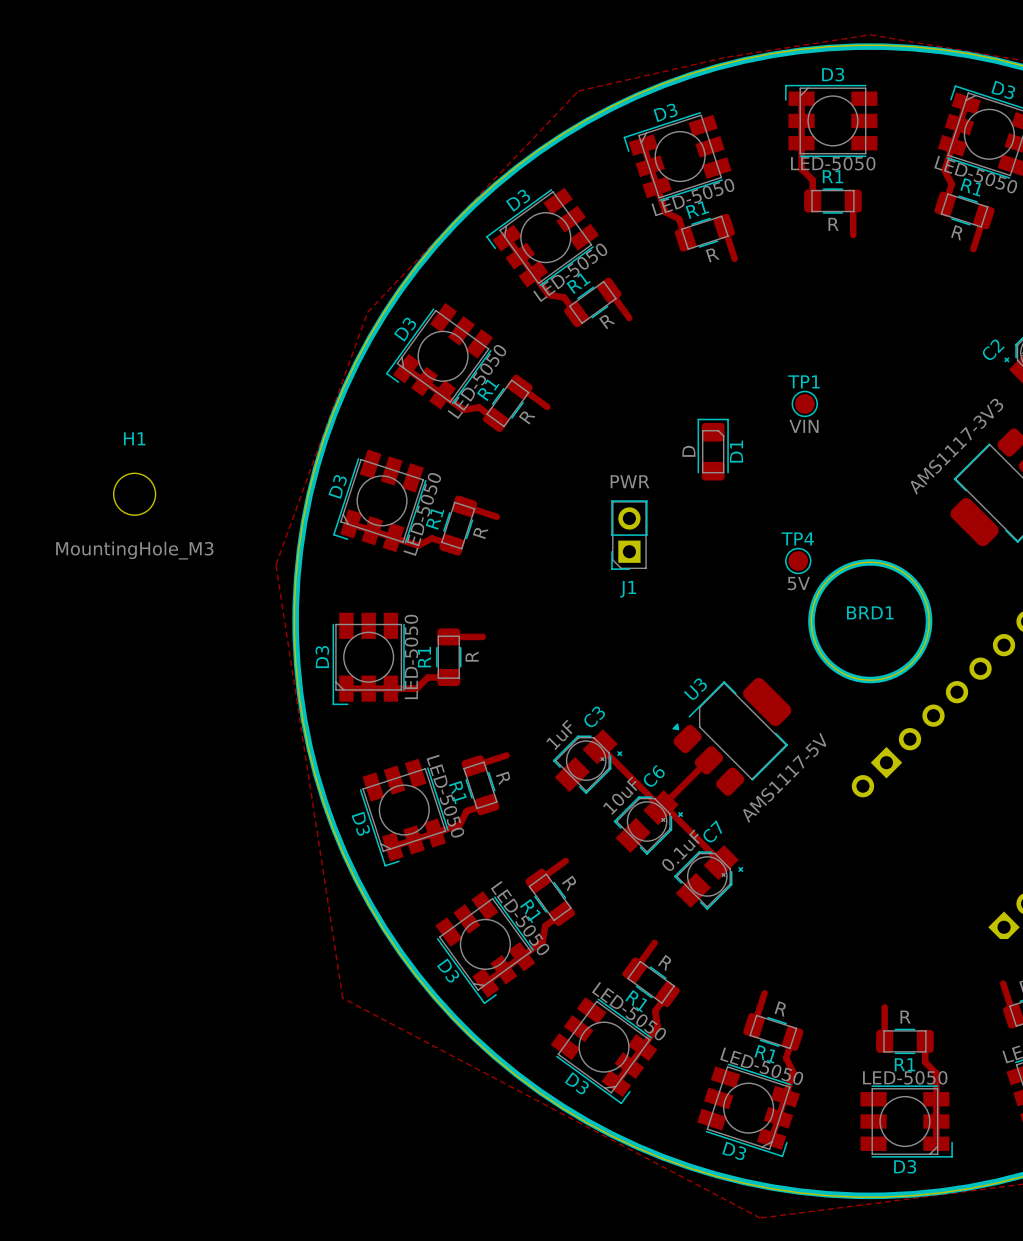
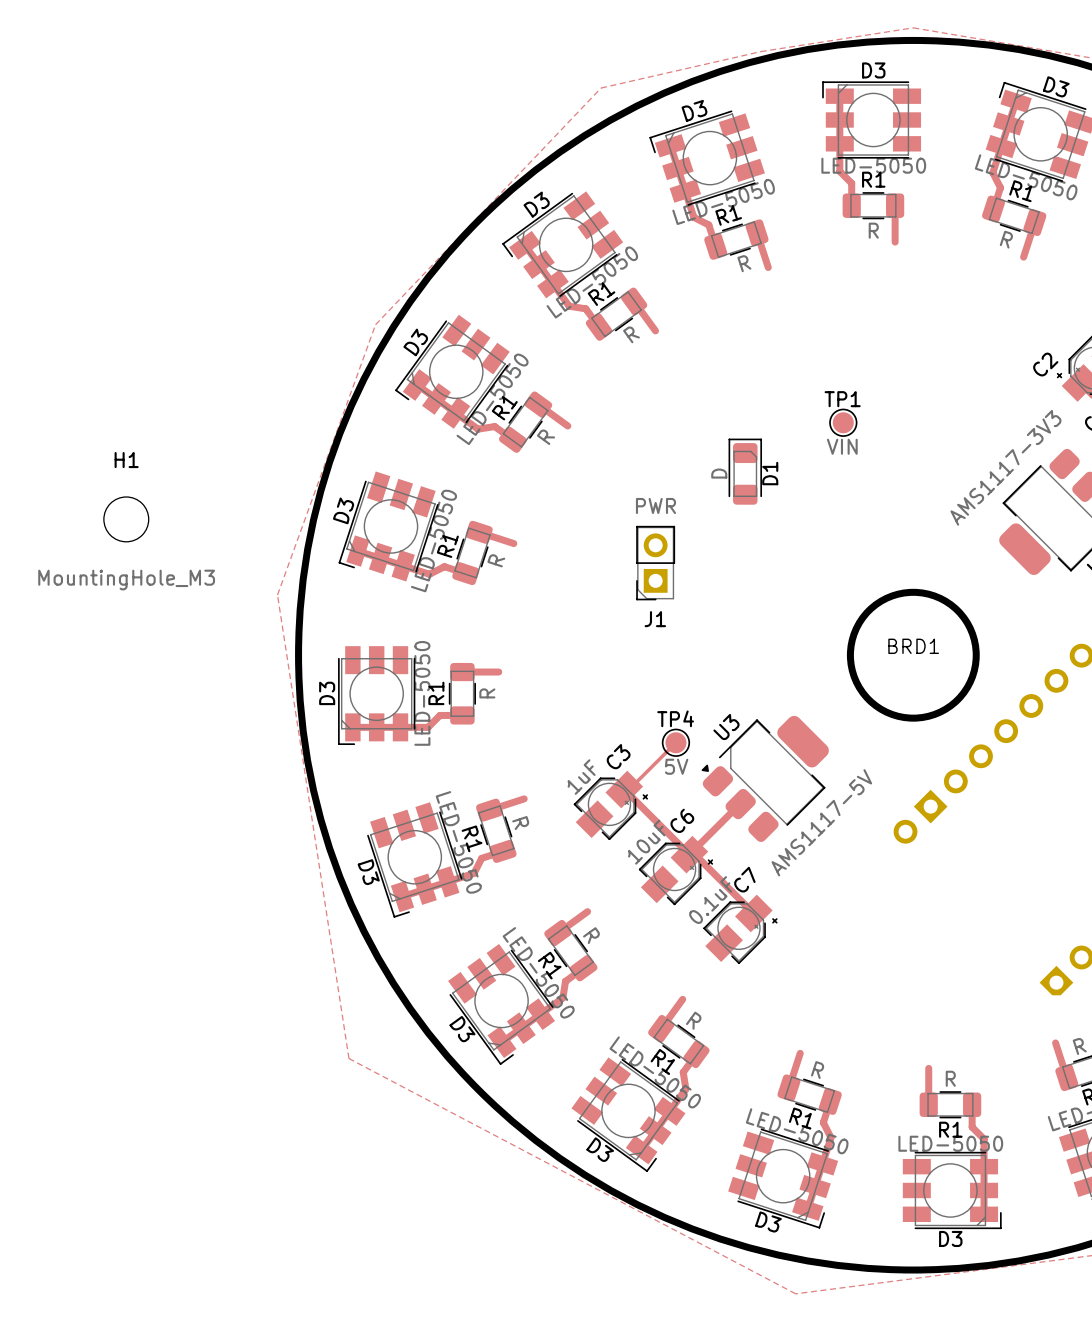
TP4 position: (798, 561) -> (675, 742)
track: none -> (675, 742) (629, 789) (624, 789)

